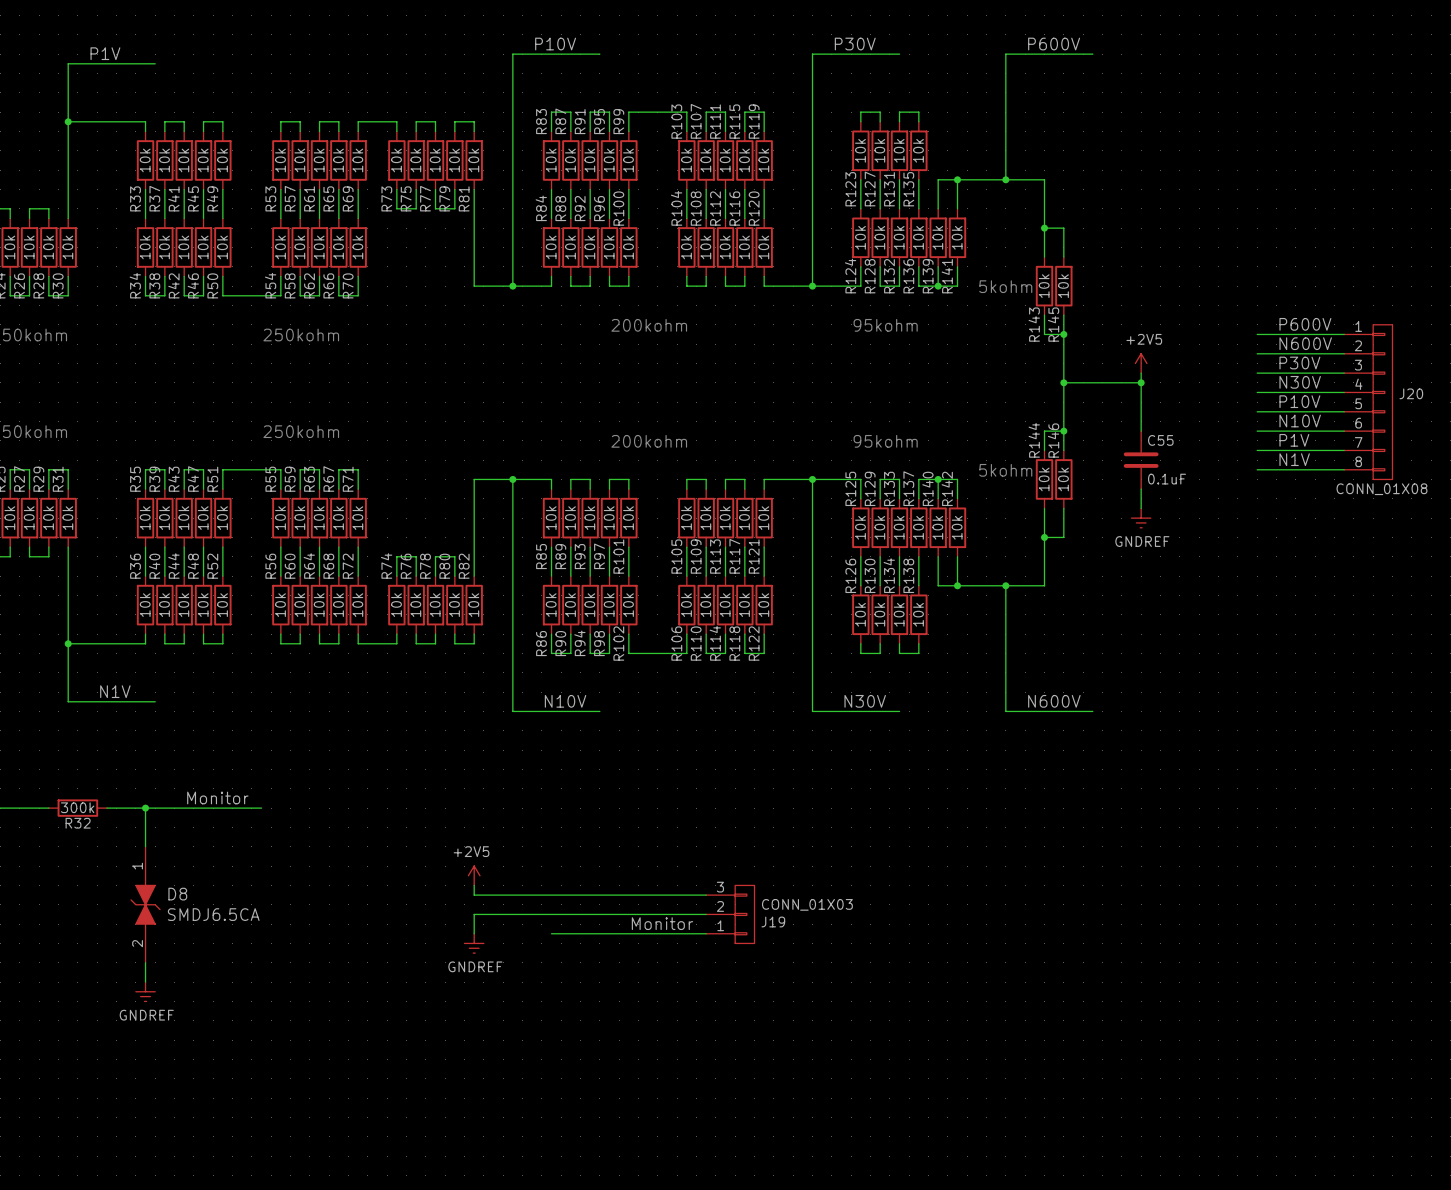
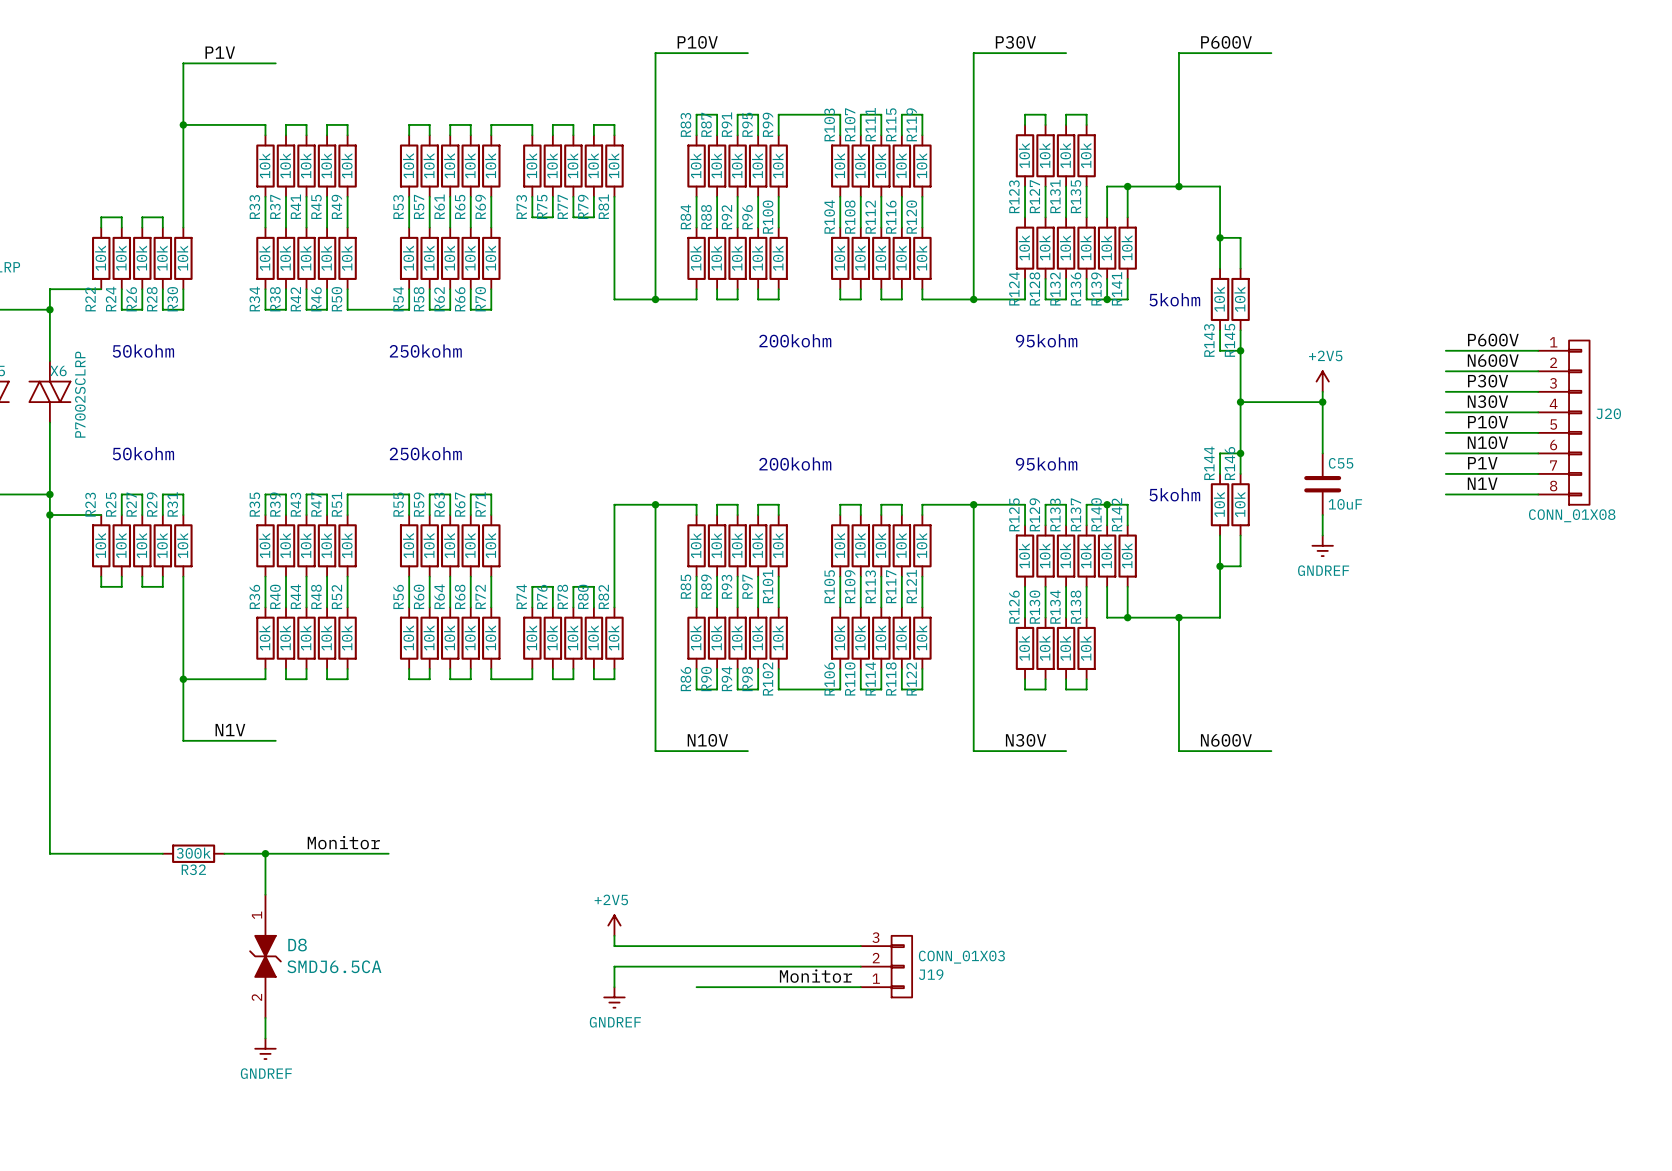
C55 value: 0.1uF (1167, 479) -> 10uF (1345, 504)

